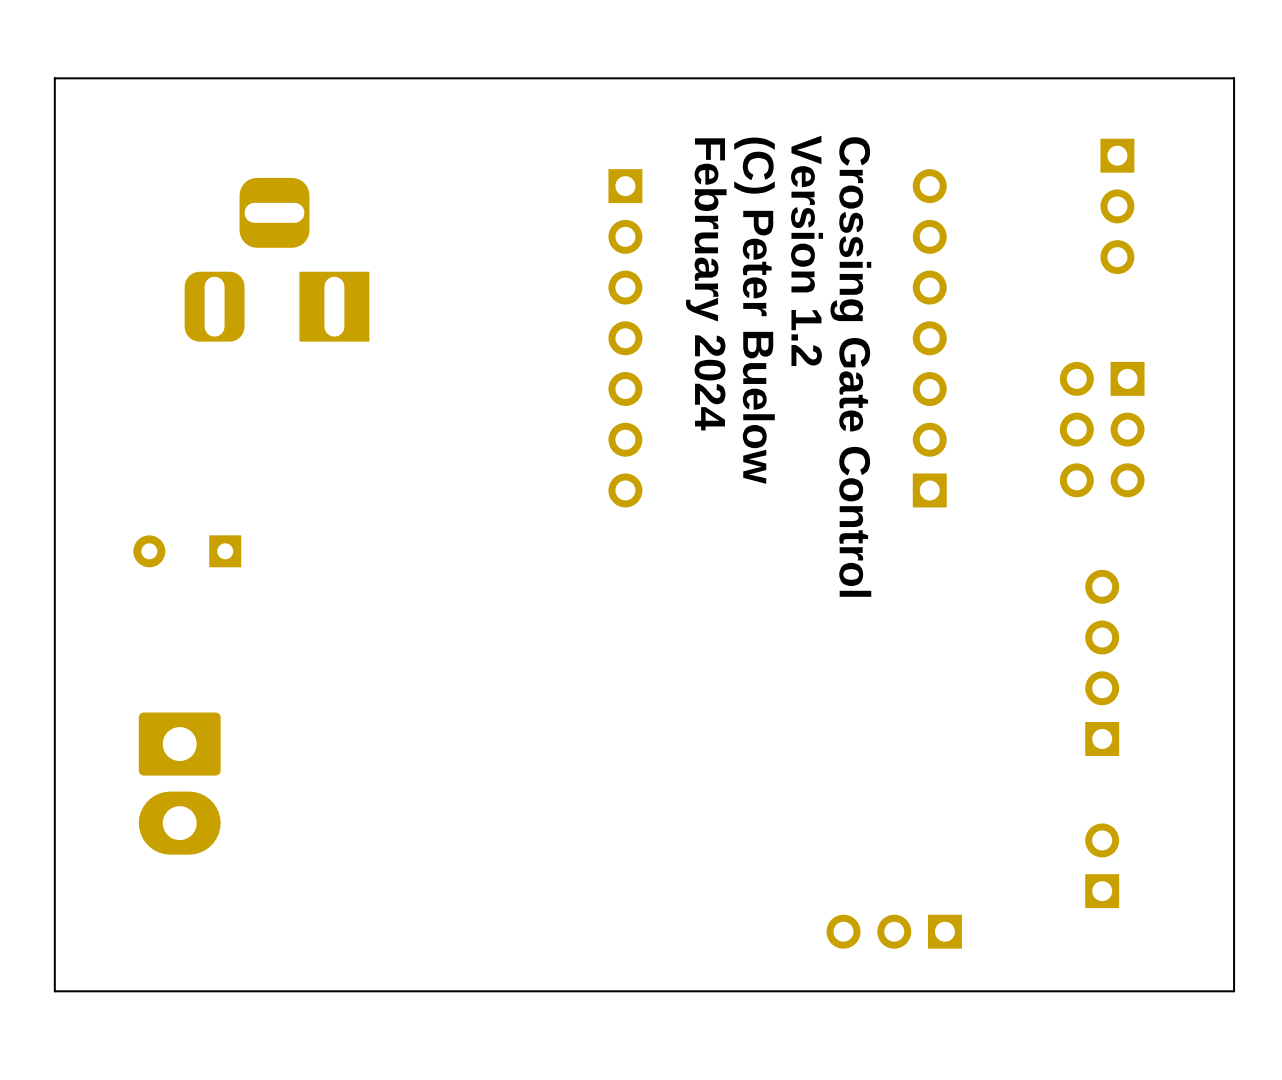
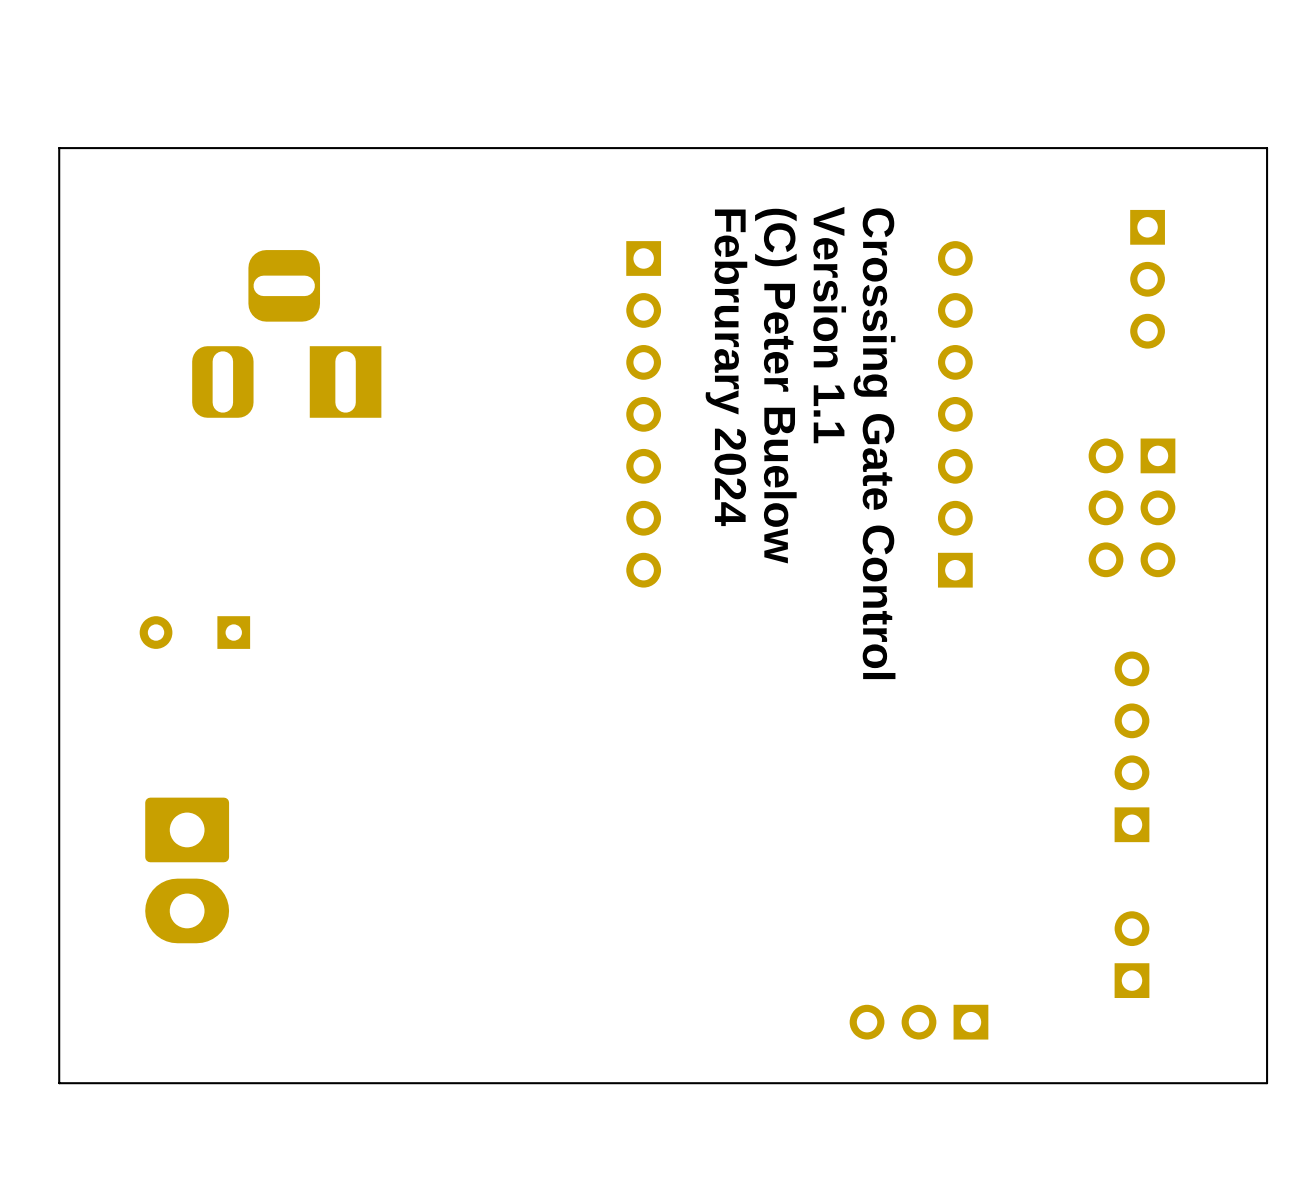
text: Version 1.2 (807, 250) -> Version 1.1 (829, 325)
text: February 2024 (706, 284) -> Februrary 2024 (726, 367)

